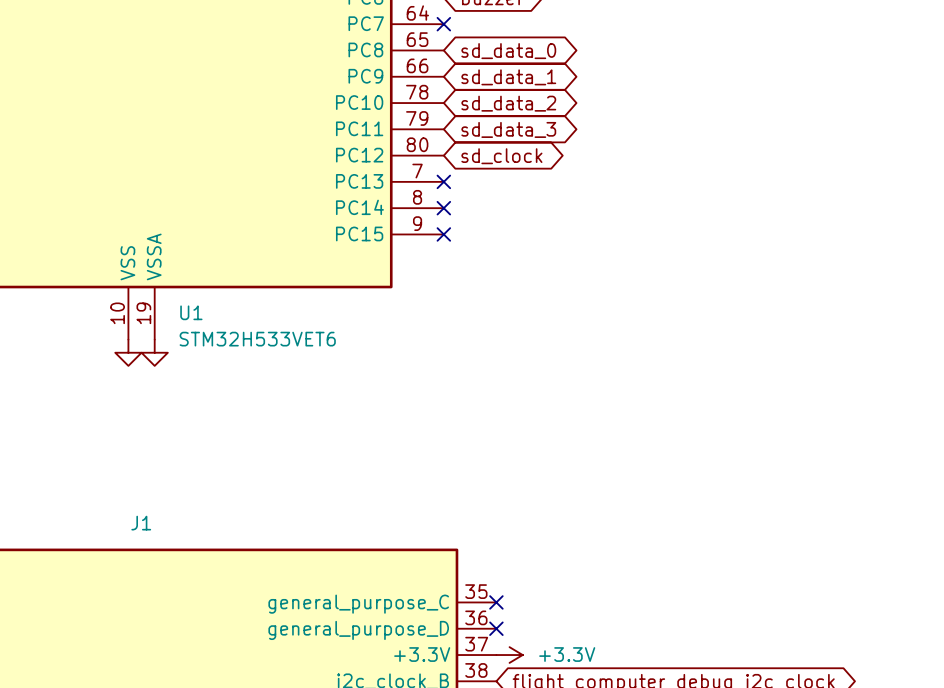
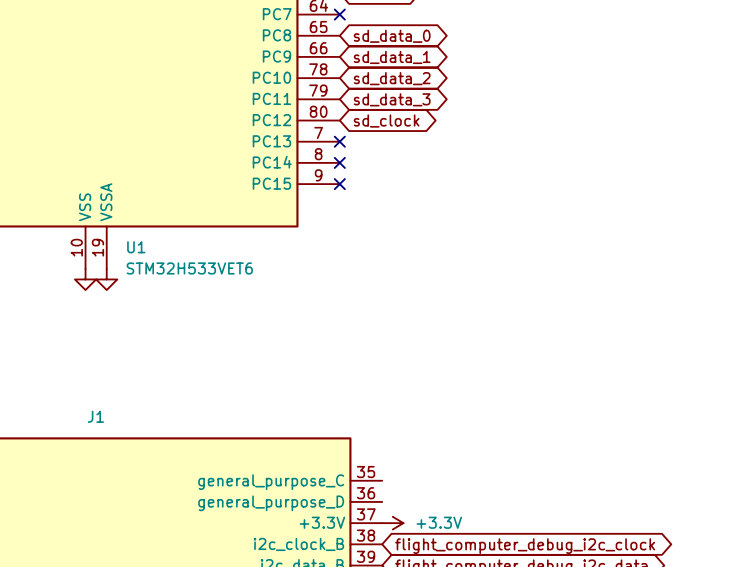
no-connect mark: (496, 602) -> none
no-connect mark: (496, 628) -> none

